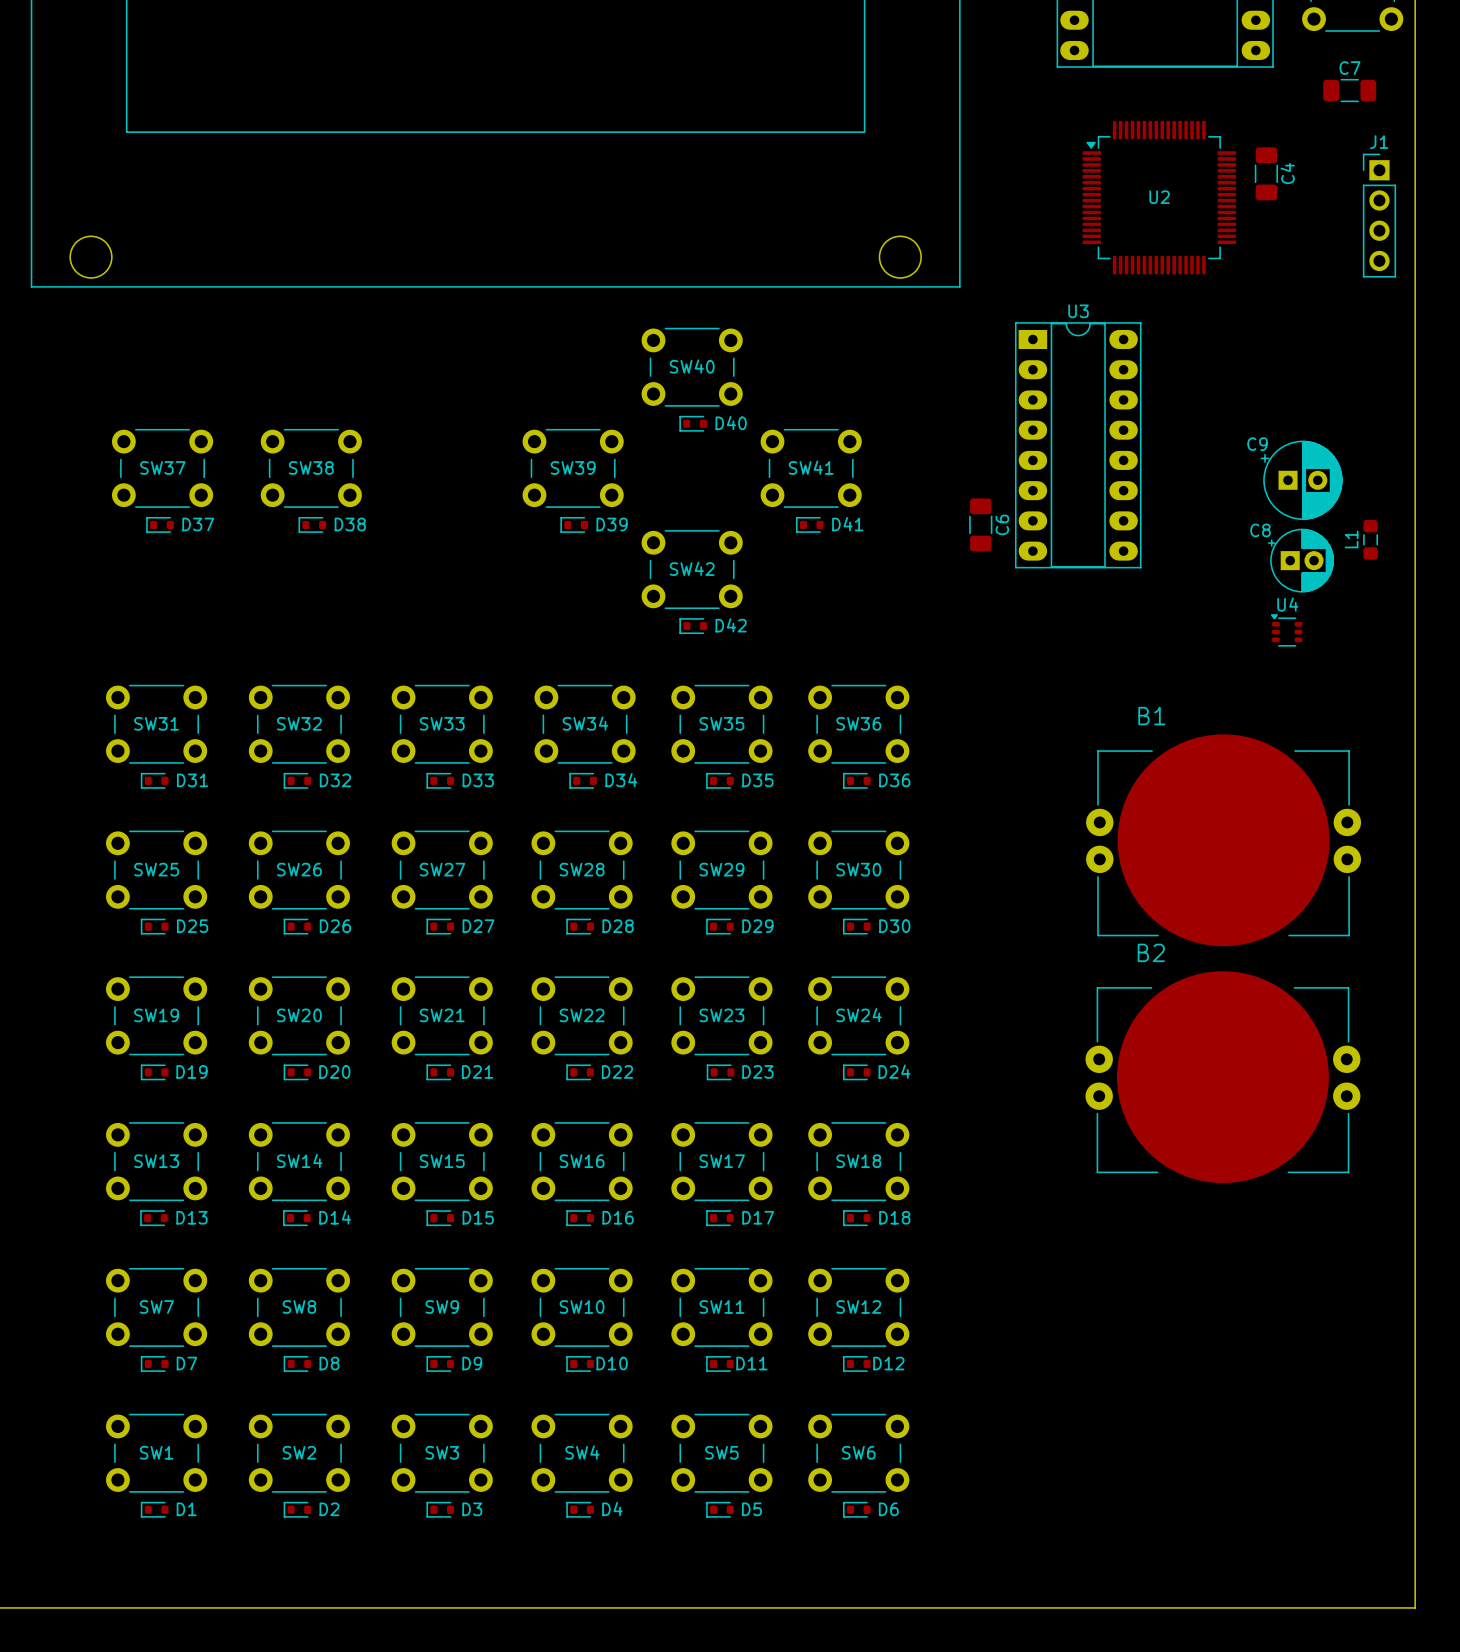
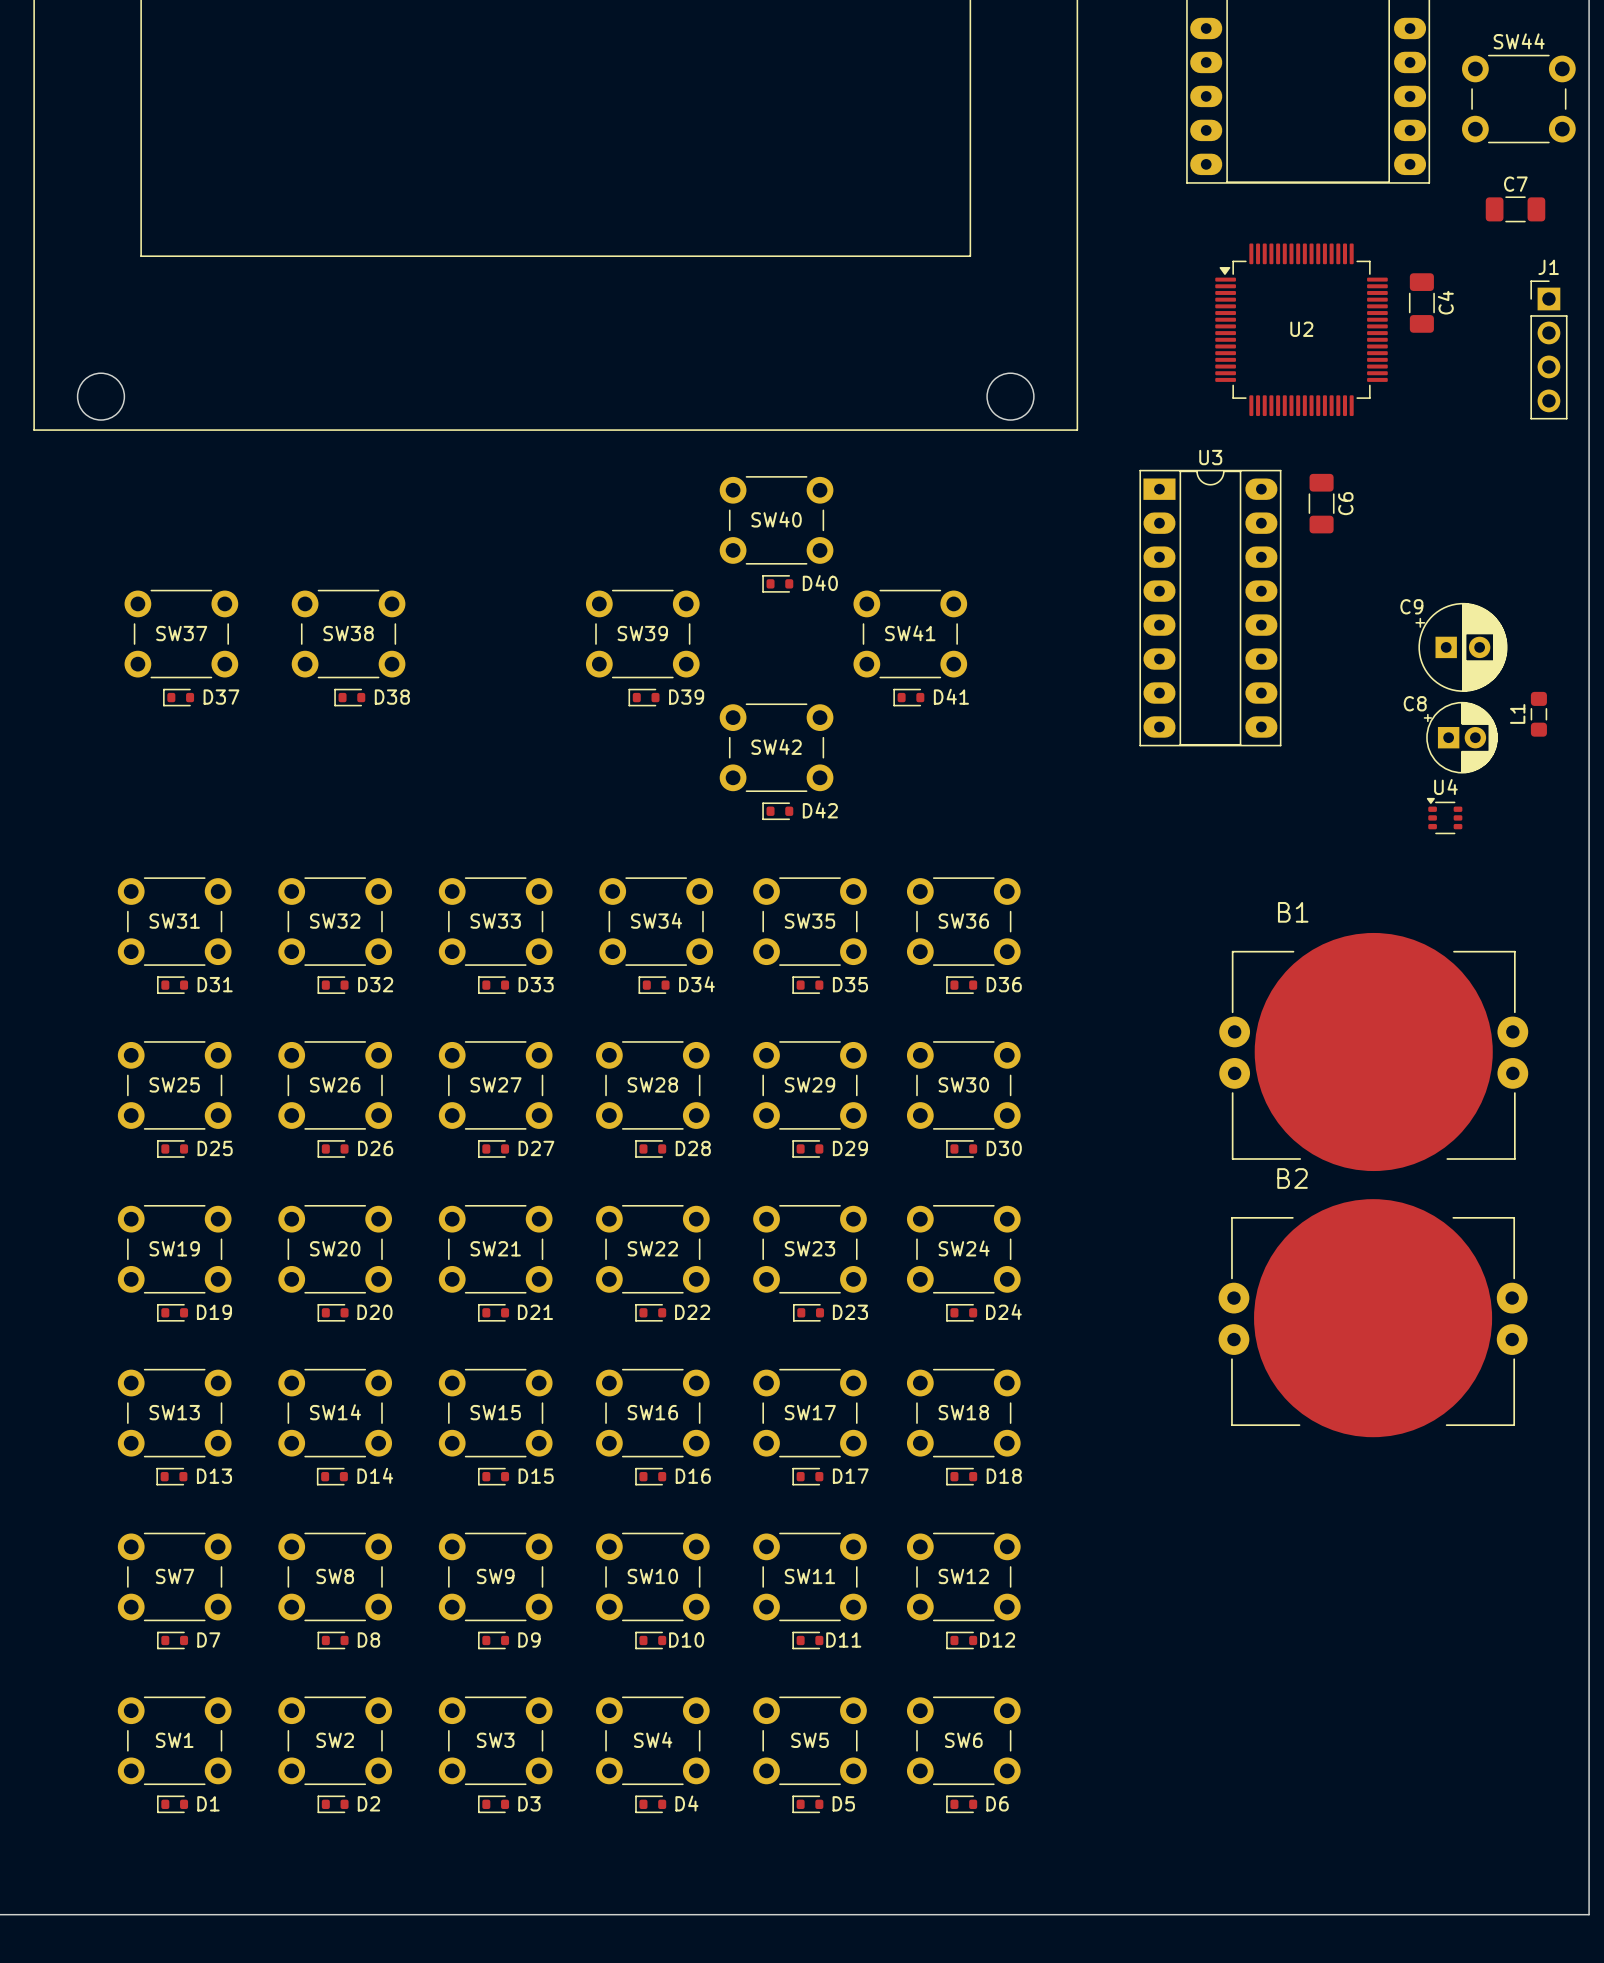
C6 position: (980, 524) -> (1321, 503)

